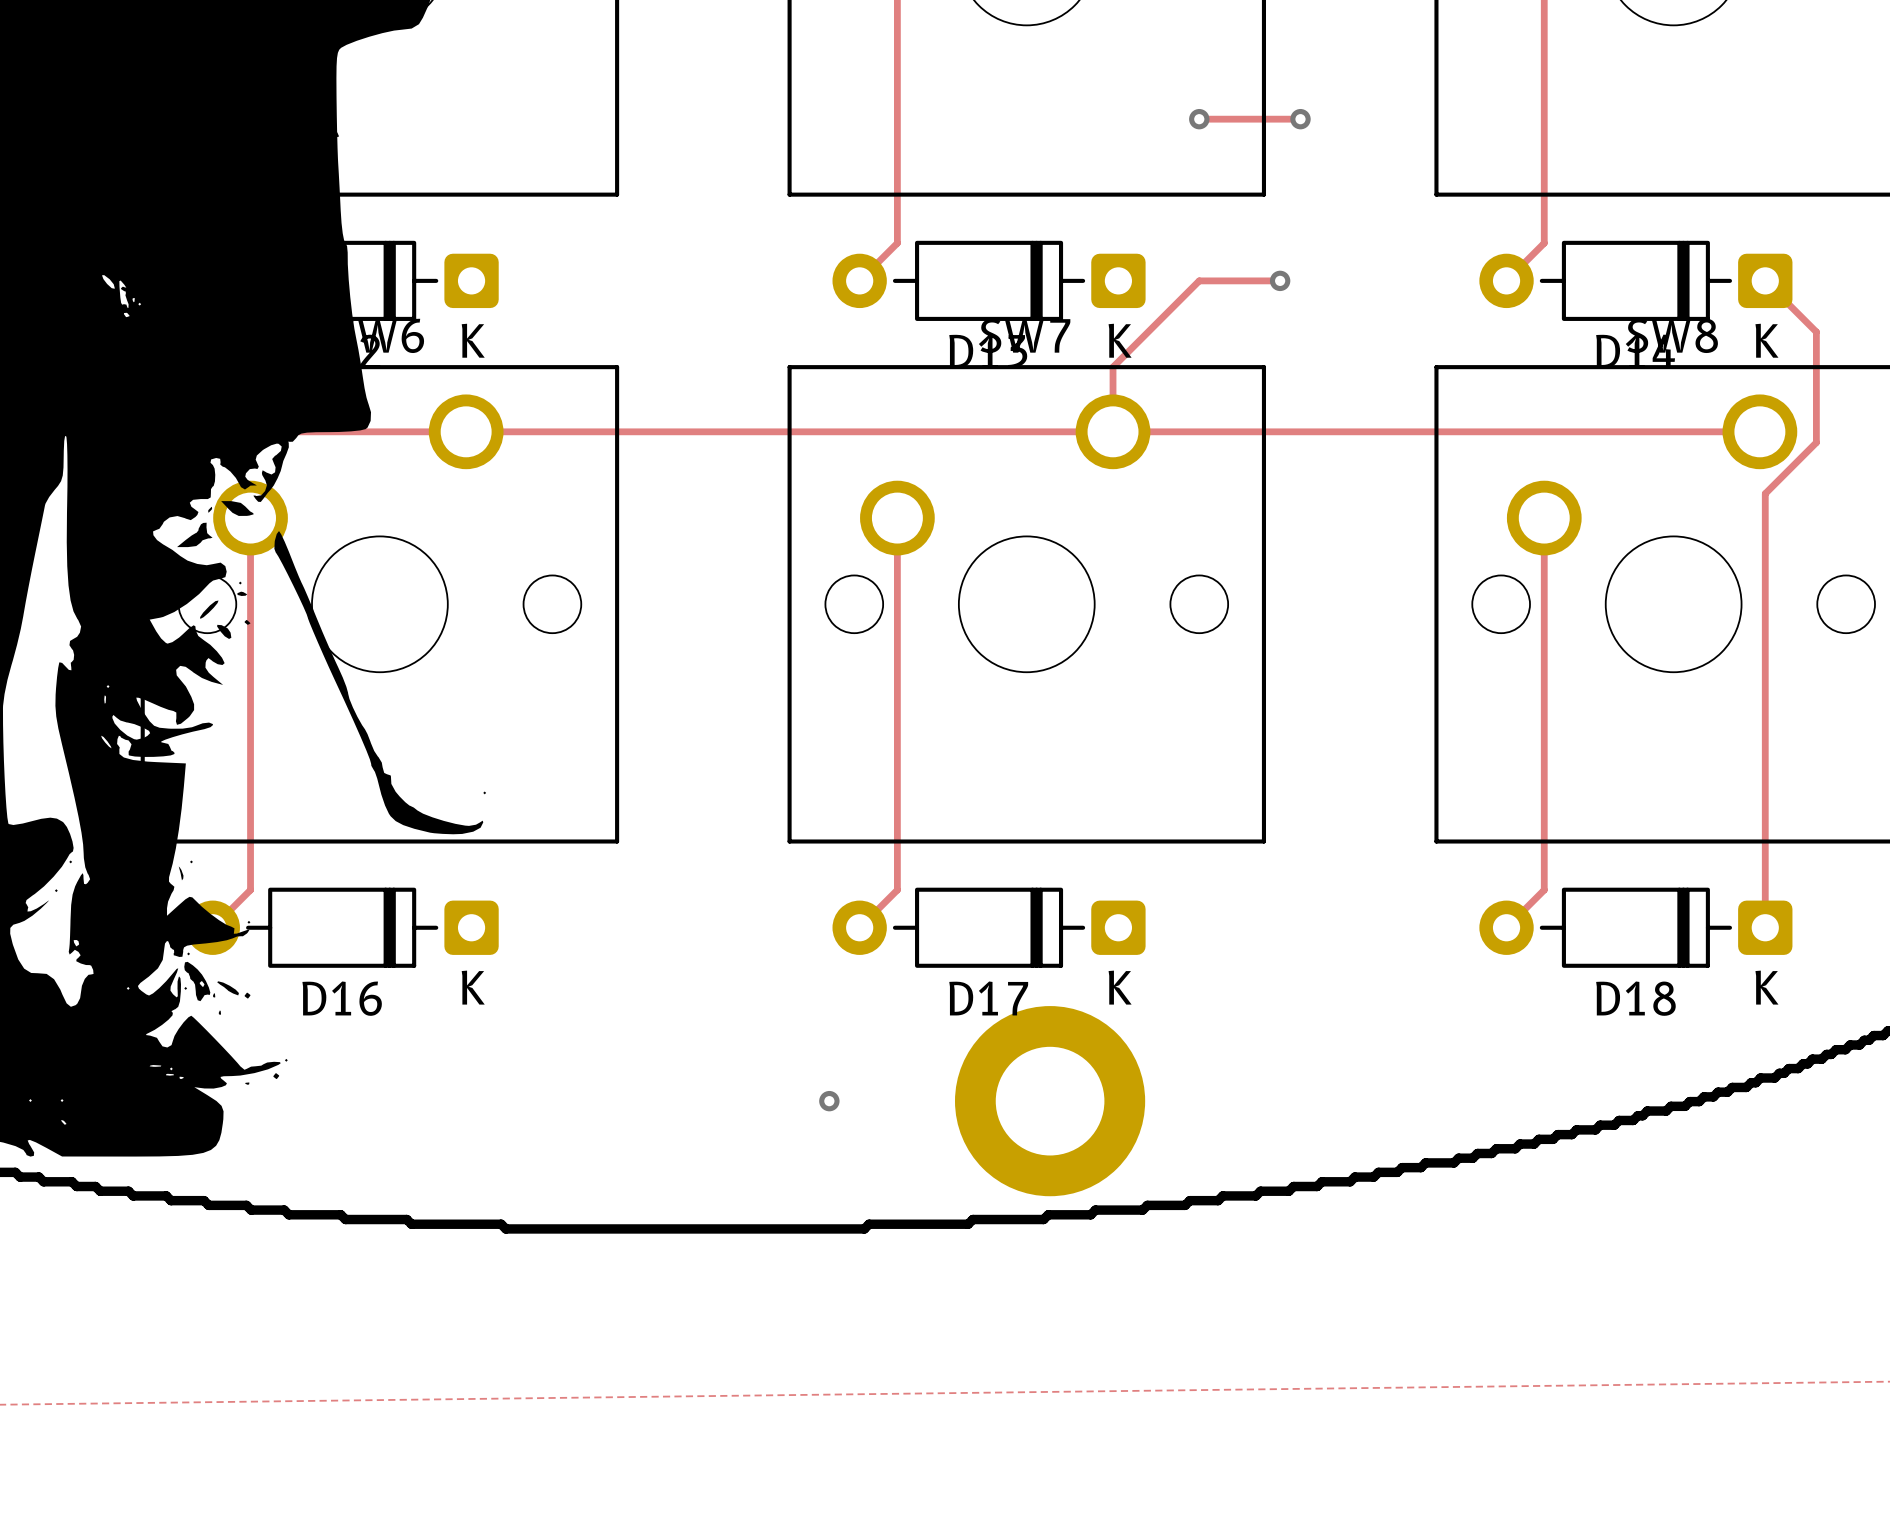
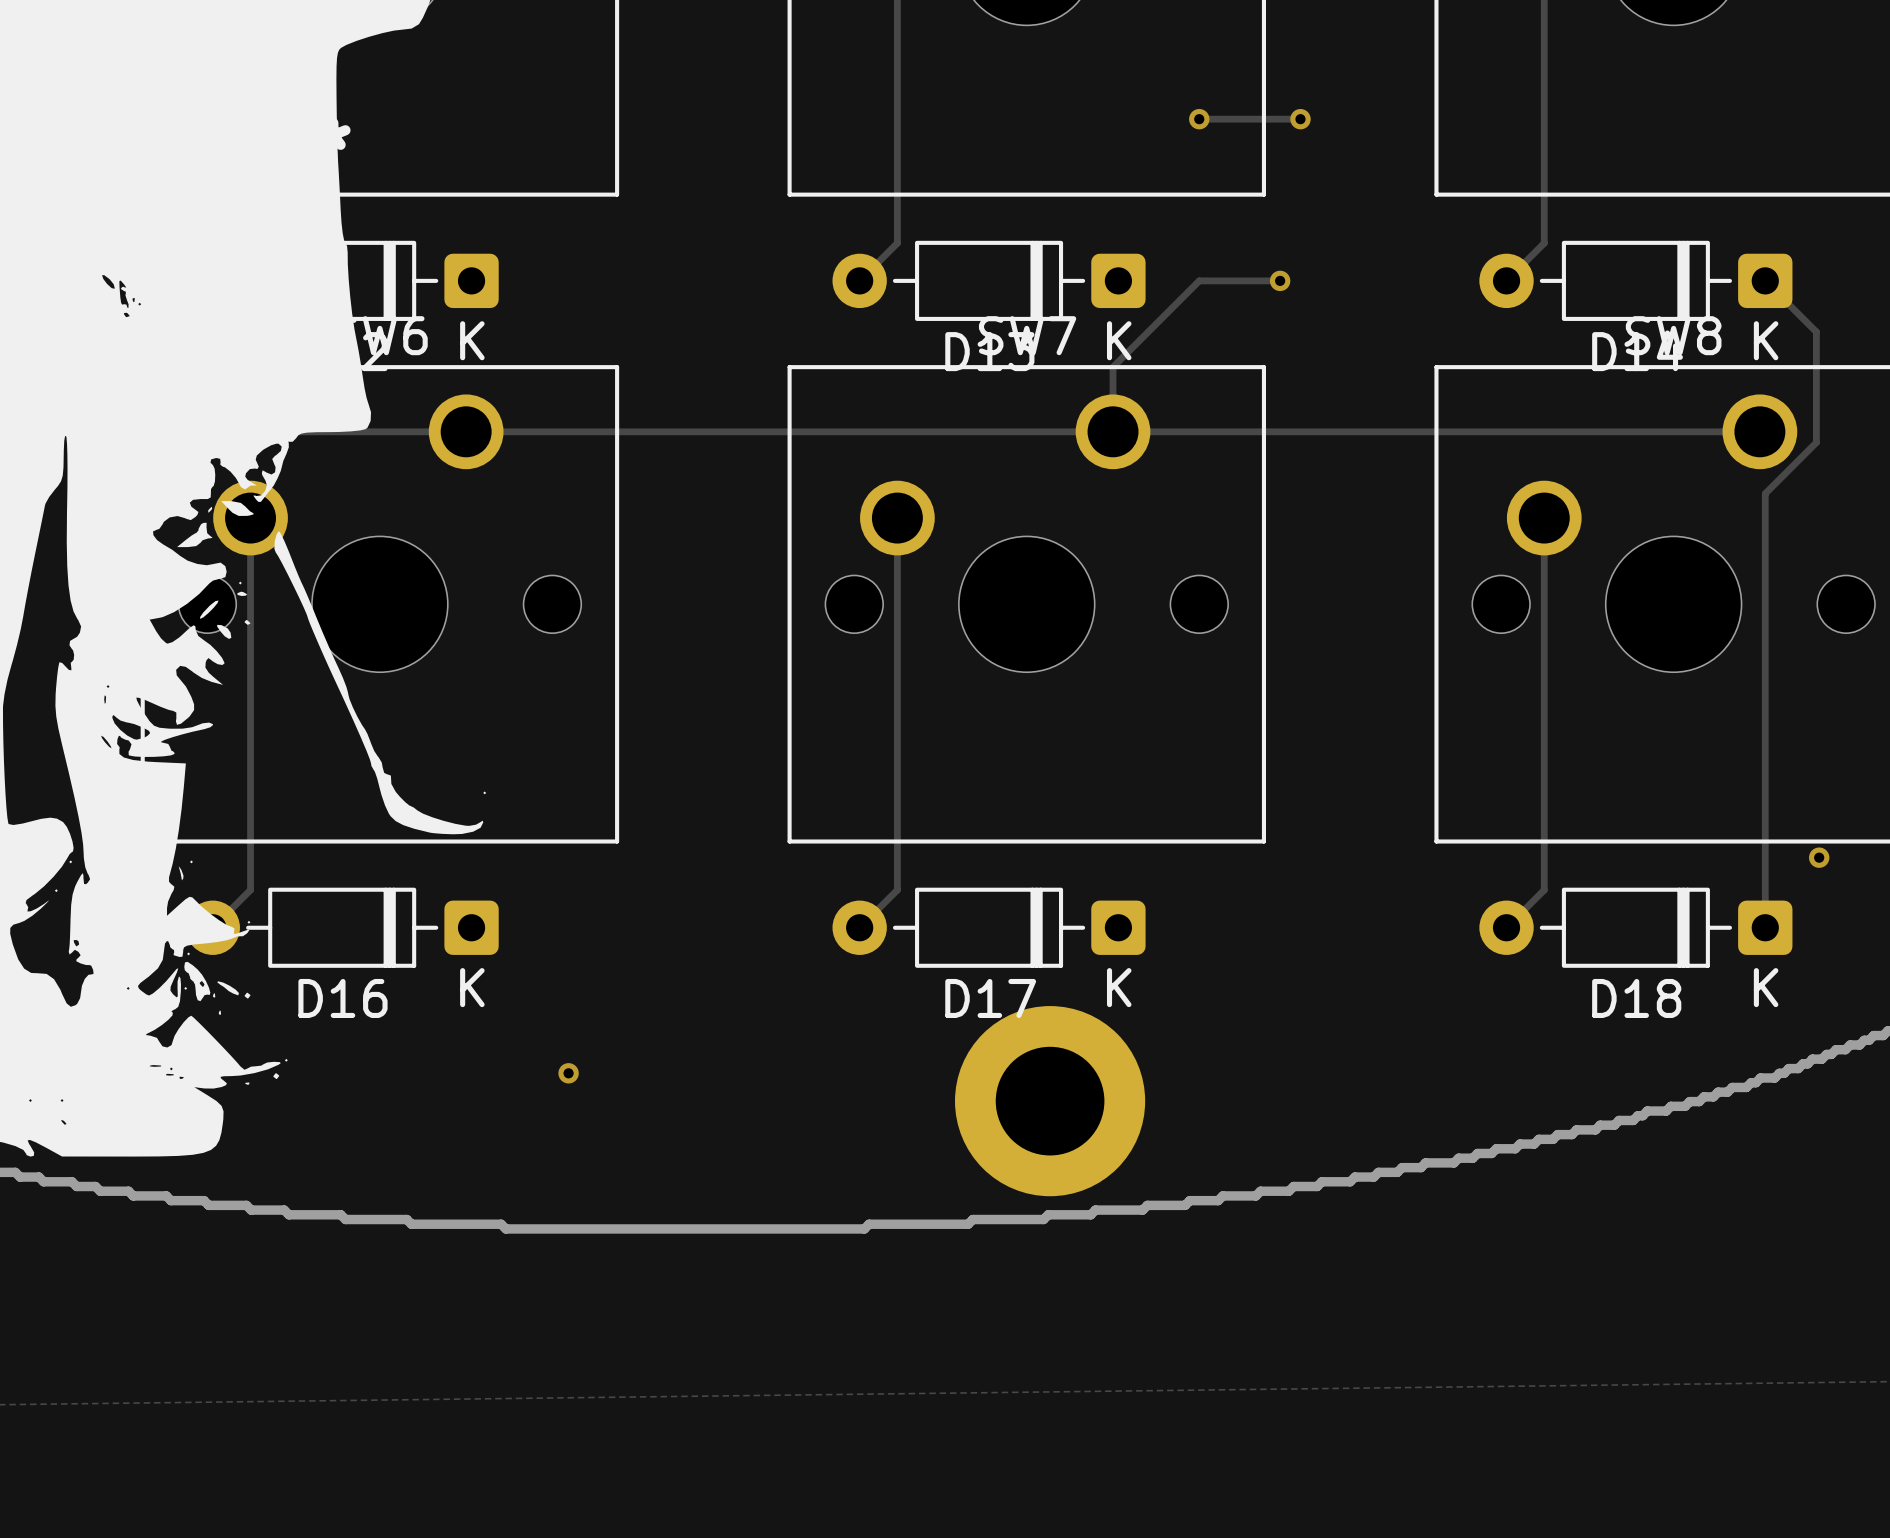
via: none -> (1819, 857)
via: none -> (568, 1073)
via: (829, 1101) -> none

